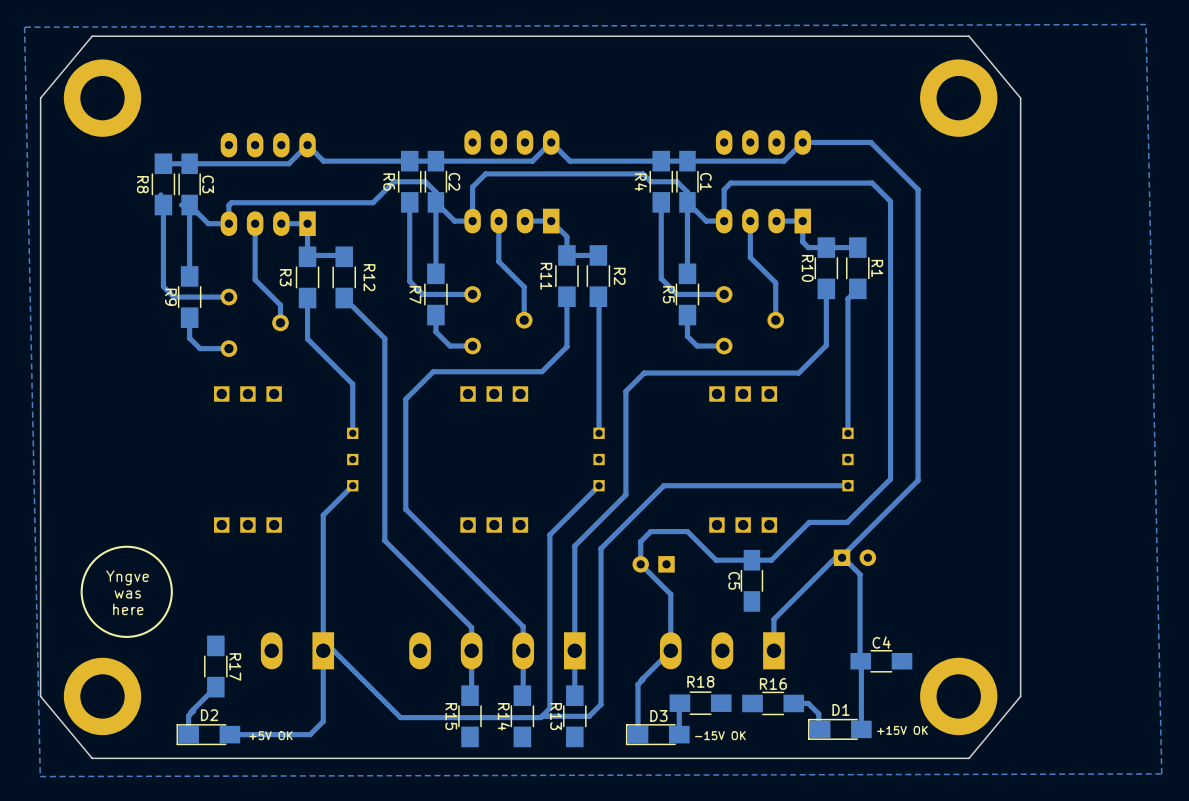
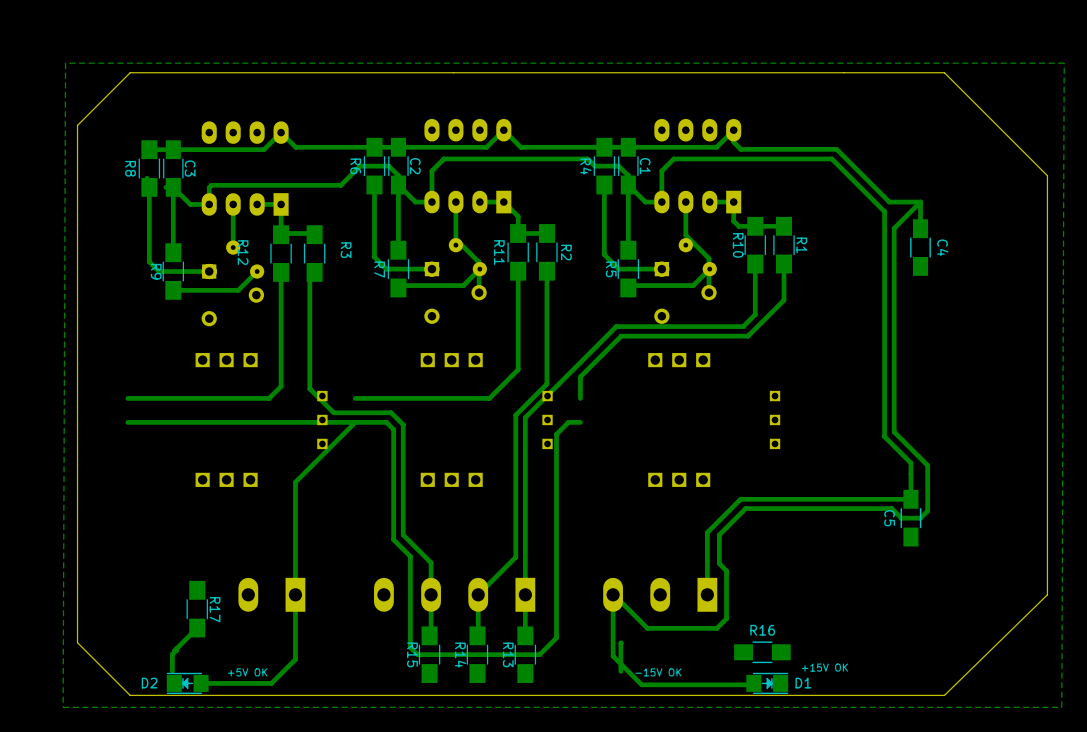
bottom zone outline: (1146, 24) (1161, 773) (40, 776) (24, 27) (1146, 24) -> (1064, 63) (1061, 707) (63, 707) (65, 63) (1064, 63)
board edge: (969, 36) (92, 36) (40, 98) (40, 696) (92, 758) (969, 758) (1020, 696) (1020, 98) (969, 36) -> (944, 72) (1047, 175) (1047, 594) (944, 695) (130, 695) (77, 642) (77, 125) (130, 72) (944, 72)
part: (102, 98) -> none
part: (958, 98) -> none
bottom track: (802, 142) (870, 142) (918, 189) (918, 480) (839, 559) -> (733, 130) (733, 142) (740, 149) (836, 149) (889, 202) (920, 202)
bottom track: (724, 189) (730, 183) (872, 183) (890, 201) (890, 479) (847, 522) (809, 522) (771, 560) (716, 560) (687, 531) (650, 531) (640, 541) (640, 564) (670, 594) (670, 650) (640, 680) -> (661, 173) (661, 170) (673, 158) (831, 158) (884, 211) (884, 436) (910, 463) (910, 499) (740, 499) (707, 532) (707, 566)
bottom track: none -> (920, 202) (894, 228) (894, 431) (927, 465) (927, 510) (920, 518) (901, 518) (891, 508) (745, 508) (719, 534) (719, 563) (726, 570) (726, 618) (716, 628) (647, 628) (613, 594) (613, 656) (641, 684) (757, 684)
bottom track: none -> (920, 202) (920, 228)
bottom track: (255, 270) (255, 279) (280, 305) (280, 322) -> none
R3 name position: R3 (285, 277) -> R3 (346, 250)
R12 name position: R12 (369, 277) -> R12 (243, 252)
part: none -> (455, 257)
part: none -> (685, 257)
part: none -> (233, 259)
bottom track: (857, 288) (847, 298) (847, 433) -> none
bottom track: none -> (784, 266) (784, 300) (748, 336) (621, 336) (580, 376) (580, 398)
bottom track: none -> (480, 269) (463, 285) (398, 285)
bottom track: none -> (709, 269) (693, 285) (628, 285)
bottom track: (598, 296) (599, 433) -> (546, 271) (546, 384) (515, 415) (515, 557) (479, 593)
bottom track: (344, 302) (344, 298) (384, 338) (384, 540) (471, 627) -> (309, 271) (309, 388) (333, 412) (391, 412) (403, 424) (403, 534) (431, 562) (431, 573)
bottom track: (435, 315) (435, 331) (450, 346) (472, 346) -> none
bottom track: (687, 315) (687, 336) (697, 346) (724, 346) -> none
bottom track: (189, 317) (189, 338) (200, 348) (228, 348) -> (173, 290) (238, 290) (257, 271)
bottom track: (307, 338) (352, 384) (352, 433) -> (281, 309) (281, 386) (269, 398) (127, 398)
bottom track: (826, 344) (798, 373) (644, 373) (625, 391) (625, 494) (574, 545) -> (755, 314) (743, 326) (616, 326) (525, 417) (525, 499)
bottom track: (566, 346) (542, 371) (433, 371) (405, 399) (405, 509) (523, 626) (523, 649) -> (518, 317) (518, 369) (489, 398) (355, 398)
bottom track: none -> (127, 422) (386, 422) (393, 429) (393, 539) (410, 556) (410, 647) (417, 654) (495, 654)
bottom track: (352, 485) (323, 515) (323, 527) -> (355, 422) (295, 482)
bottom track: (599, 485) (549, 534) (549, 708) (540, 717) (400, 717) (333, 650) (323, 650) -> none
bottom track: (847, 485) (663, 485) (601, 548) (601, 704) (589, 716) -> (580, 422) (568, 422) (556, 434) (556, 637) (538, 654)
drawing: [80, 545, 173, 638] -> none
C5 footprint: [740, 549, 764, 612] -> [900, 489, 922, 547]
part: (854, 557) -> none
part: (653, 564) -> none
text: Yngve (127, 577) -> none
text: was (127, 594) -> none
text: here (128, 609) -> none
bottom track: (773, 619) (839, 553) (860, 574) (860, 661) -> none
C4 name position: C4 (881, 642) -> C4 (942, 247)
C4 footprint: [850, 650, 913, 673] -> [910, 219, 931, 276]
bottom track: (860, 661) (861, 729) -> none
bottom track: (642, 678) (638, 684) (638, 734) -> none
R16 footprint: [742, 691, 805, 716] -> [734, 641, 791, 664]
part: (102, 696) -> none
part: (958, 696) -> none
R18: (700, 703) -> none
bottom track: (793, 703) (808, 703) (818, 714) (820, 729) -> none
D1 name position: D1 (841, 709) -> D1 (803, 683)
D2 name position: D2 (209, 715) -> D2 (149, 683)
D1 footprint: [808, 718, 872, 740] -> [746, 672, 789, 695]
D2 footprint: [176, 724, 241, 746] -> [166, 672, 209, 695]
bottom track: (310, 734) (229, 734) -> (283, 671) (271, 683) (201, 683)
D3: (657, 734) -> none

